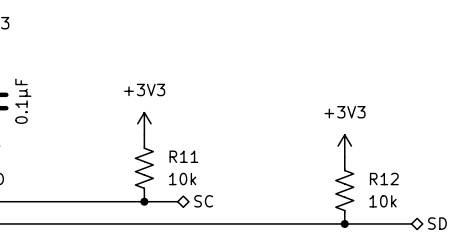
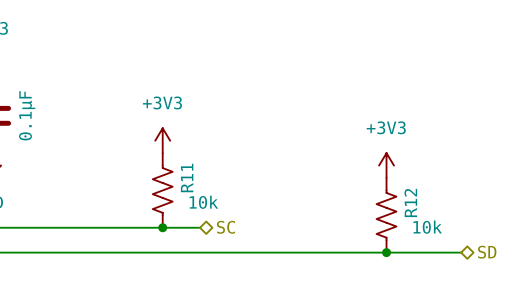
R11 name rotation: 0° (183, 156) -> 90° counterclockwise (187, 178)
R12 name rotation: 0° (384, 179) -> 90° counterclockwise (410, 203)

